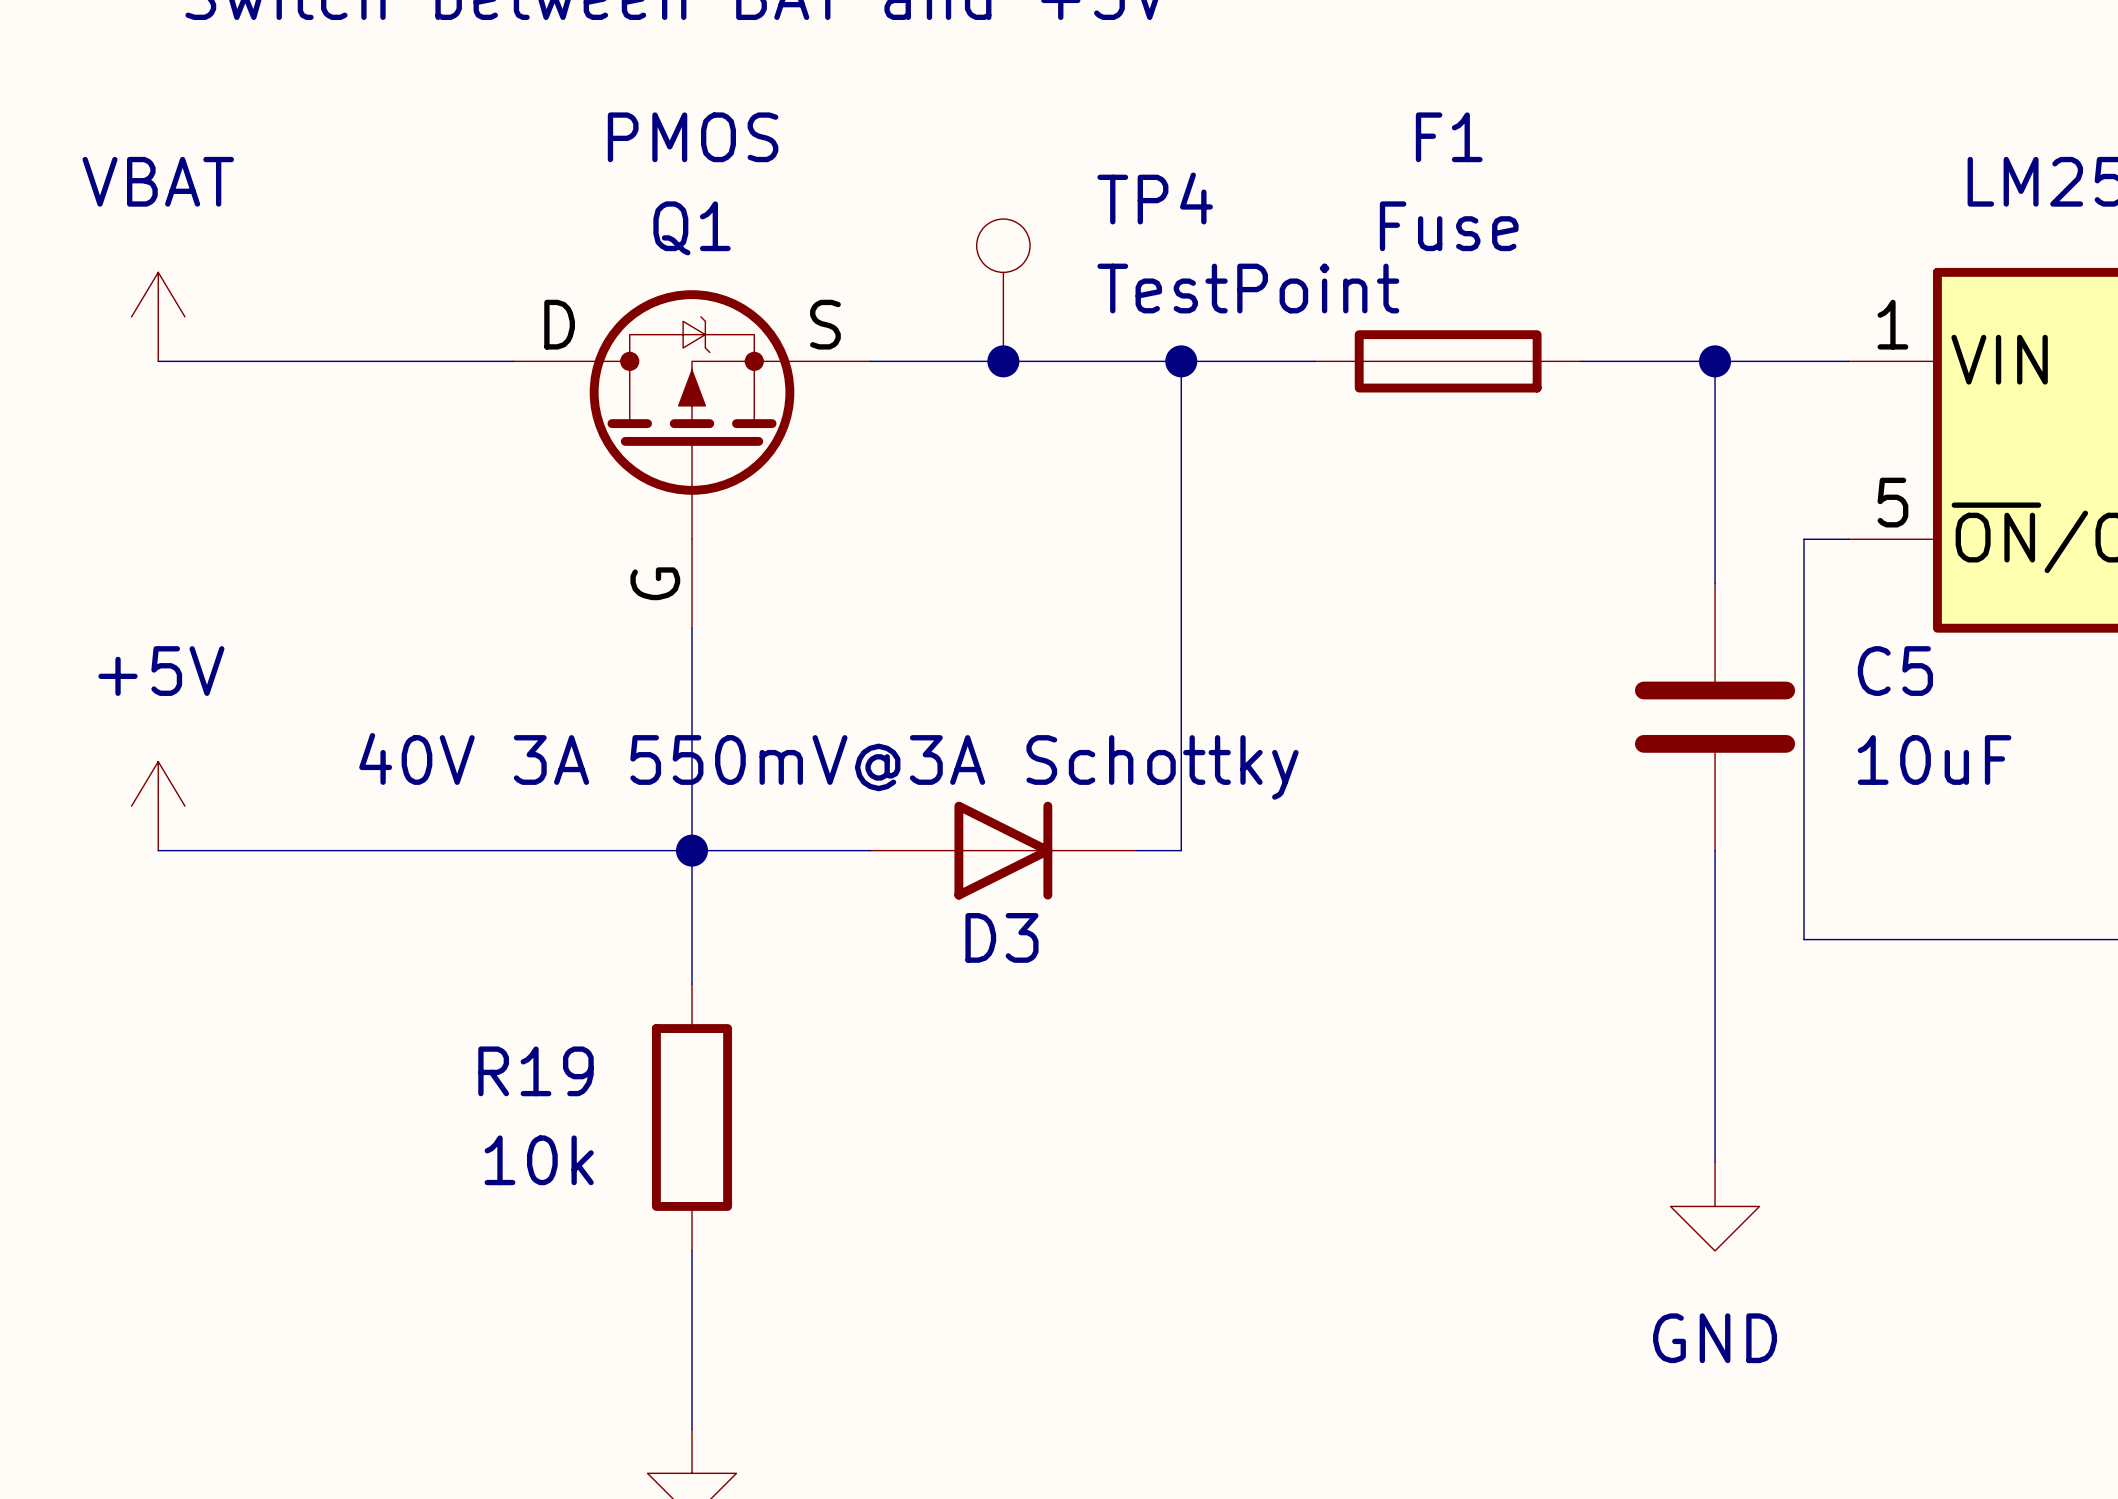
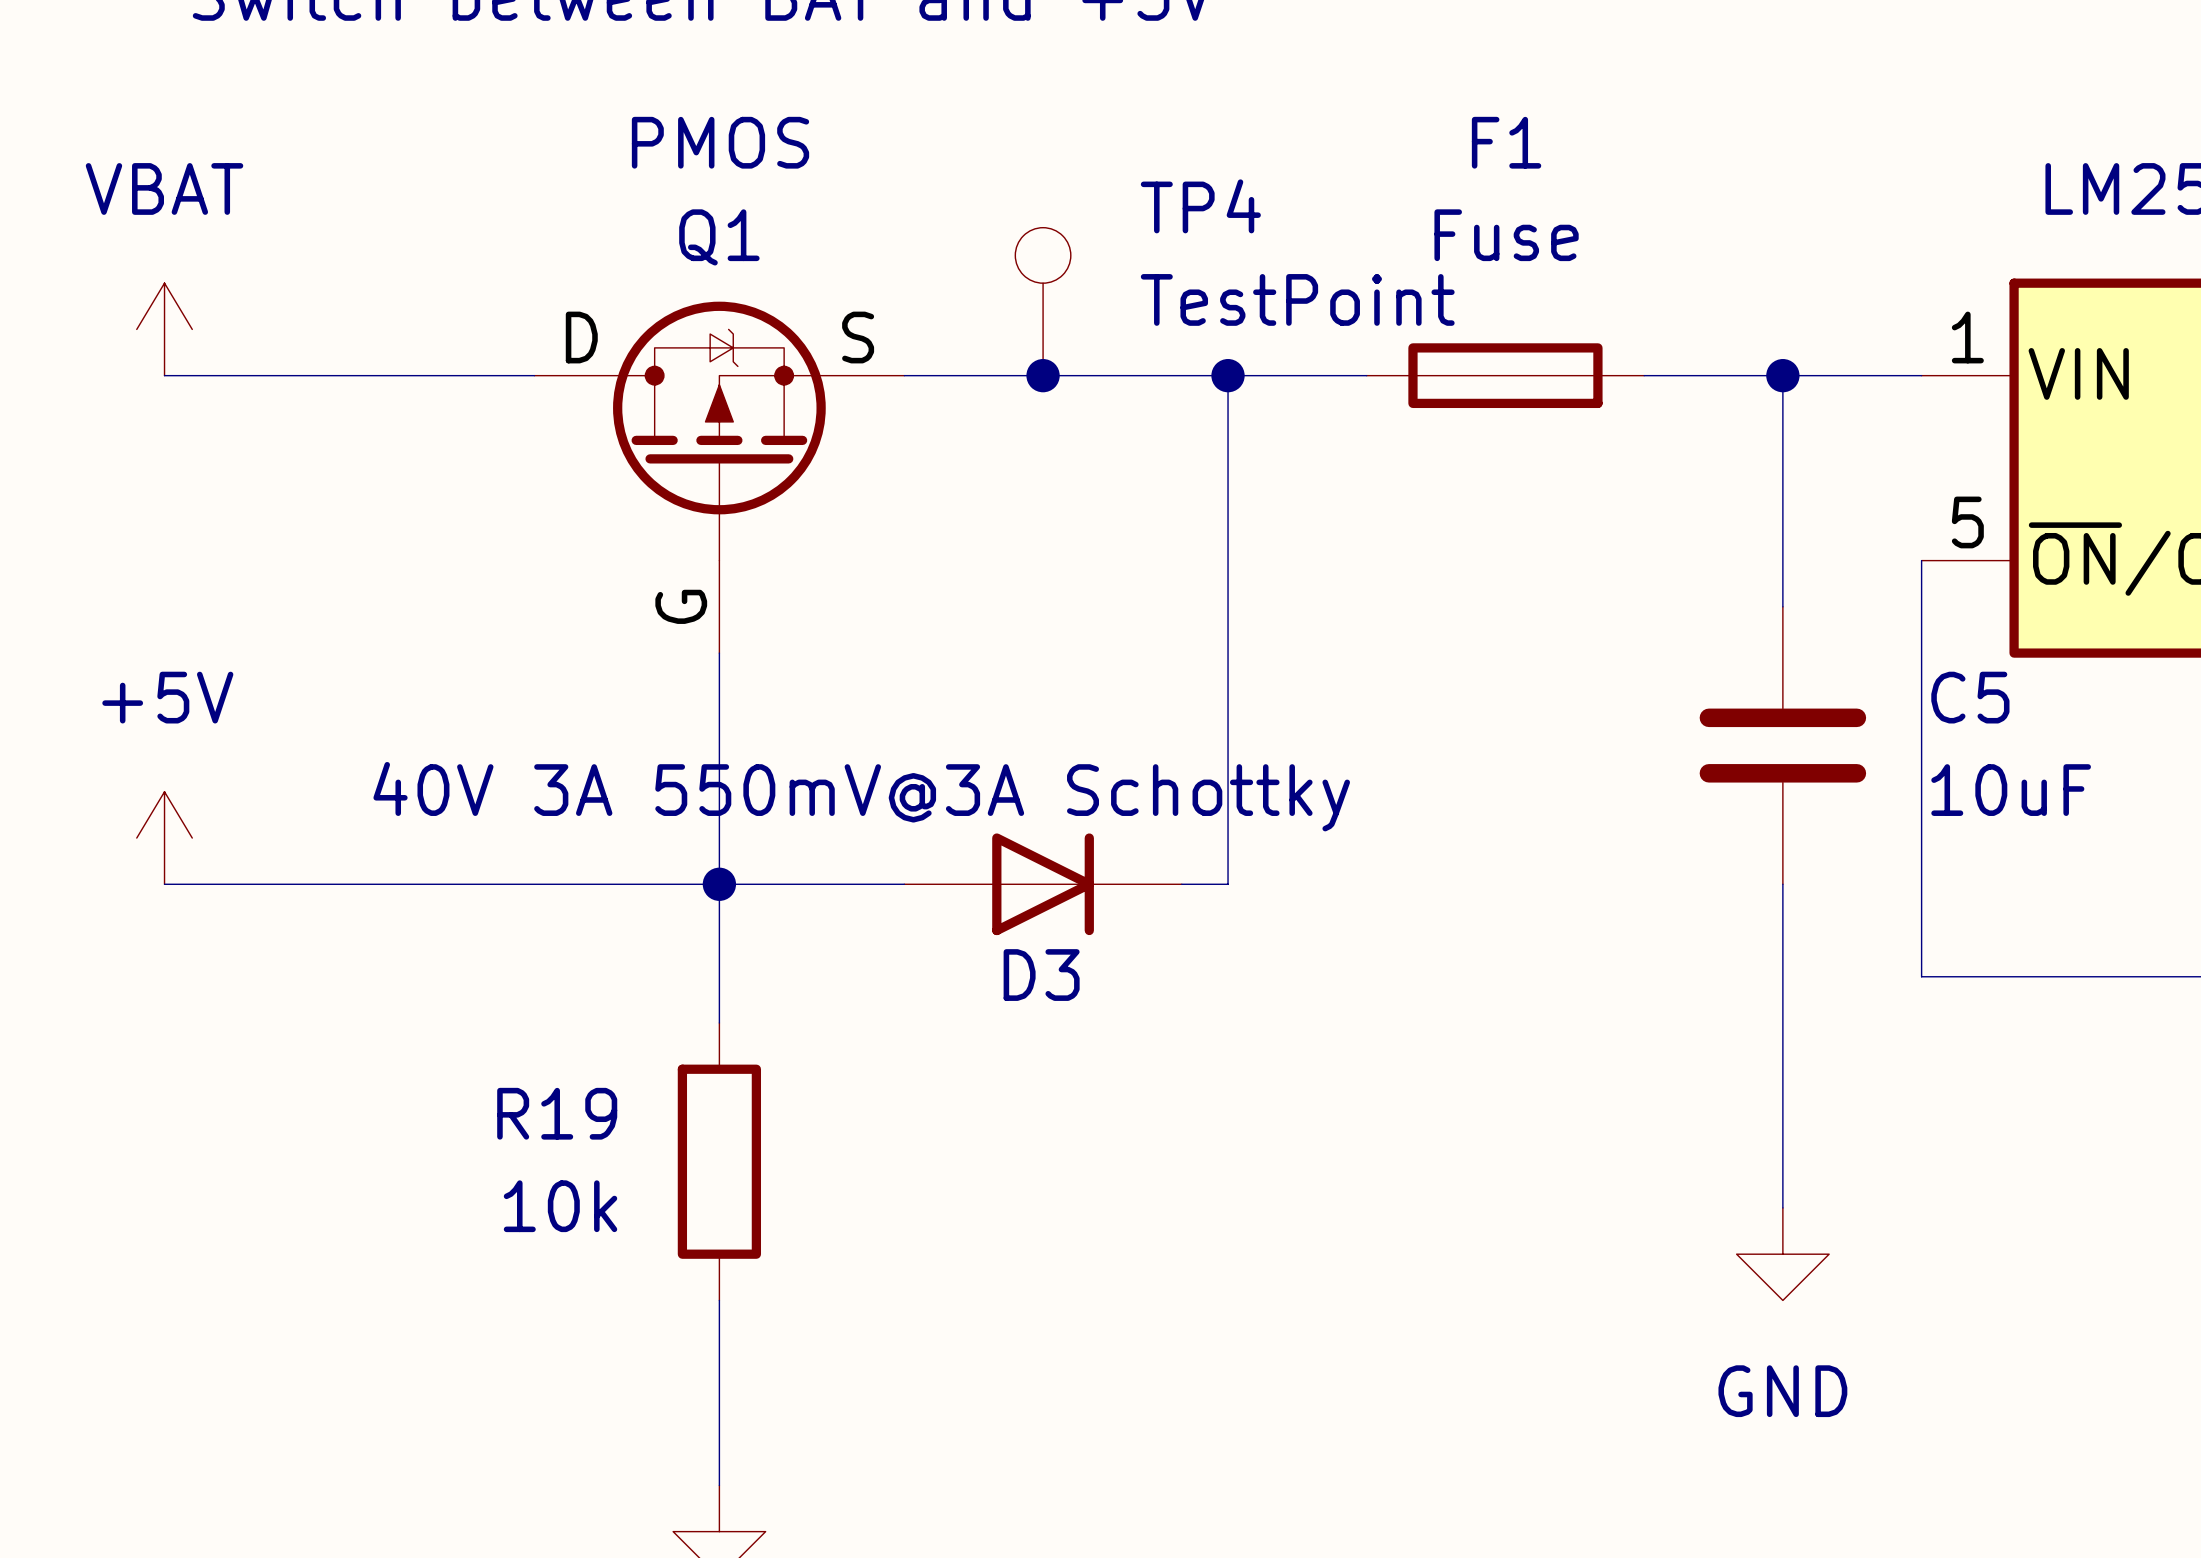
wire: (1848, 539) (1803, 539) (1803, 939) (1848, 939) -> (1921, 560) (1921, 976)

